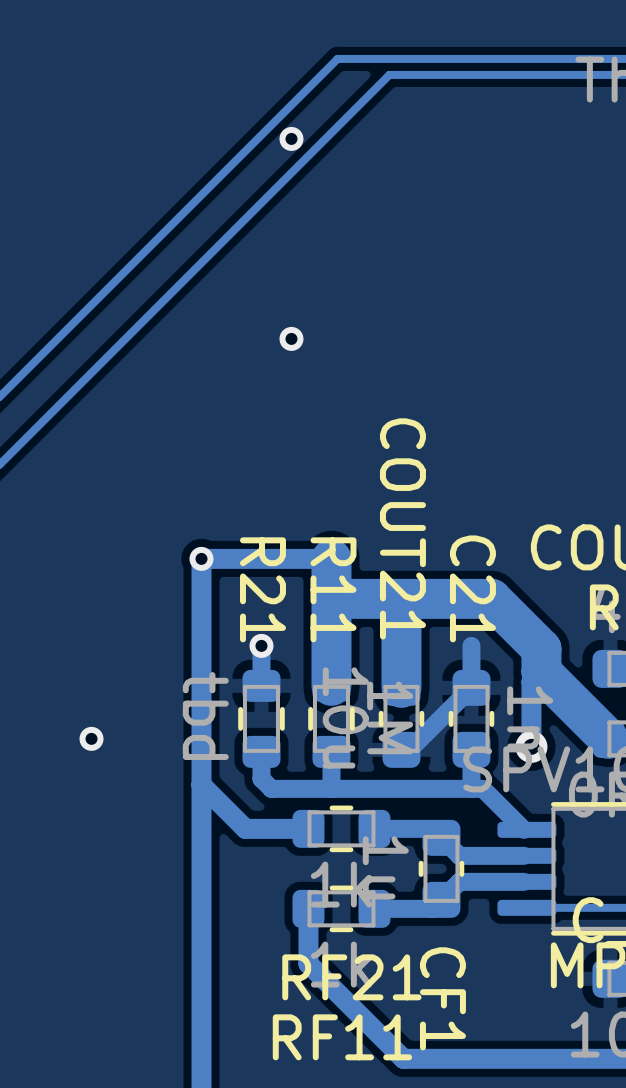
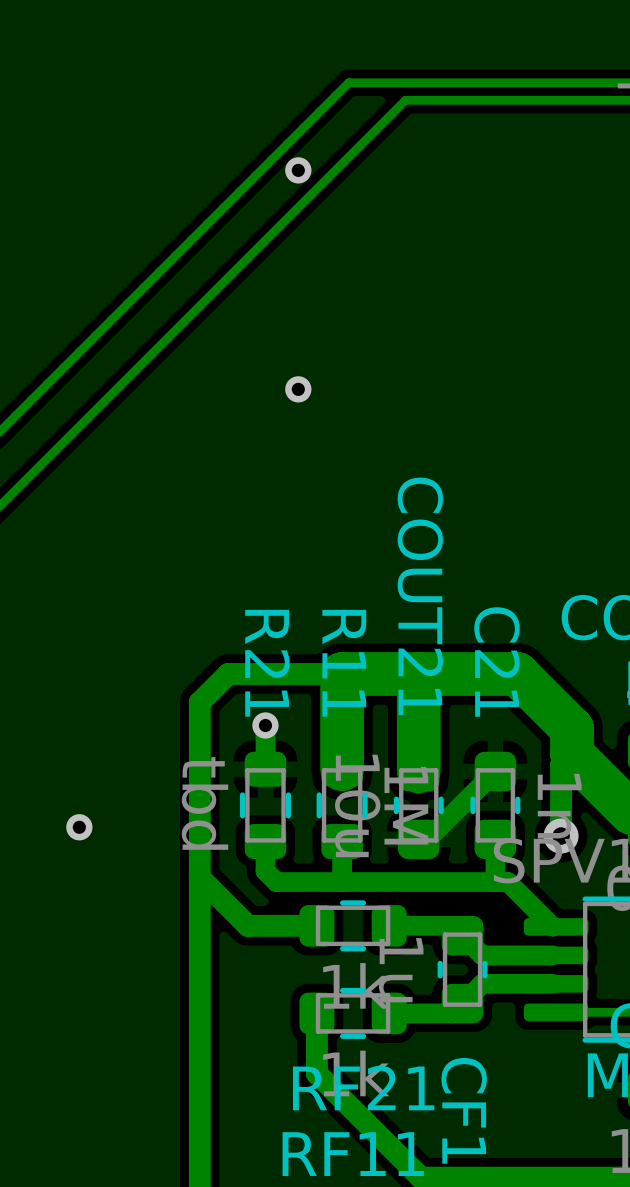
via: (201, 558) -> none
track: (331, 598) (331, 558) (201, 558) (201, 624) -> (342, 674) (228, 674) (199, 702)
track: (471, 645) (471, 687) -> none

